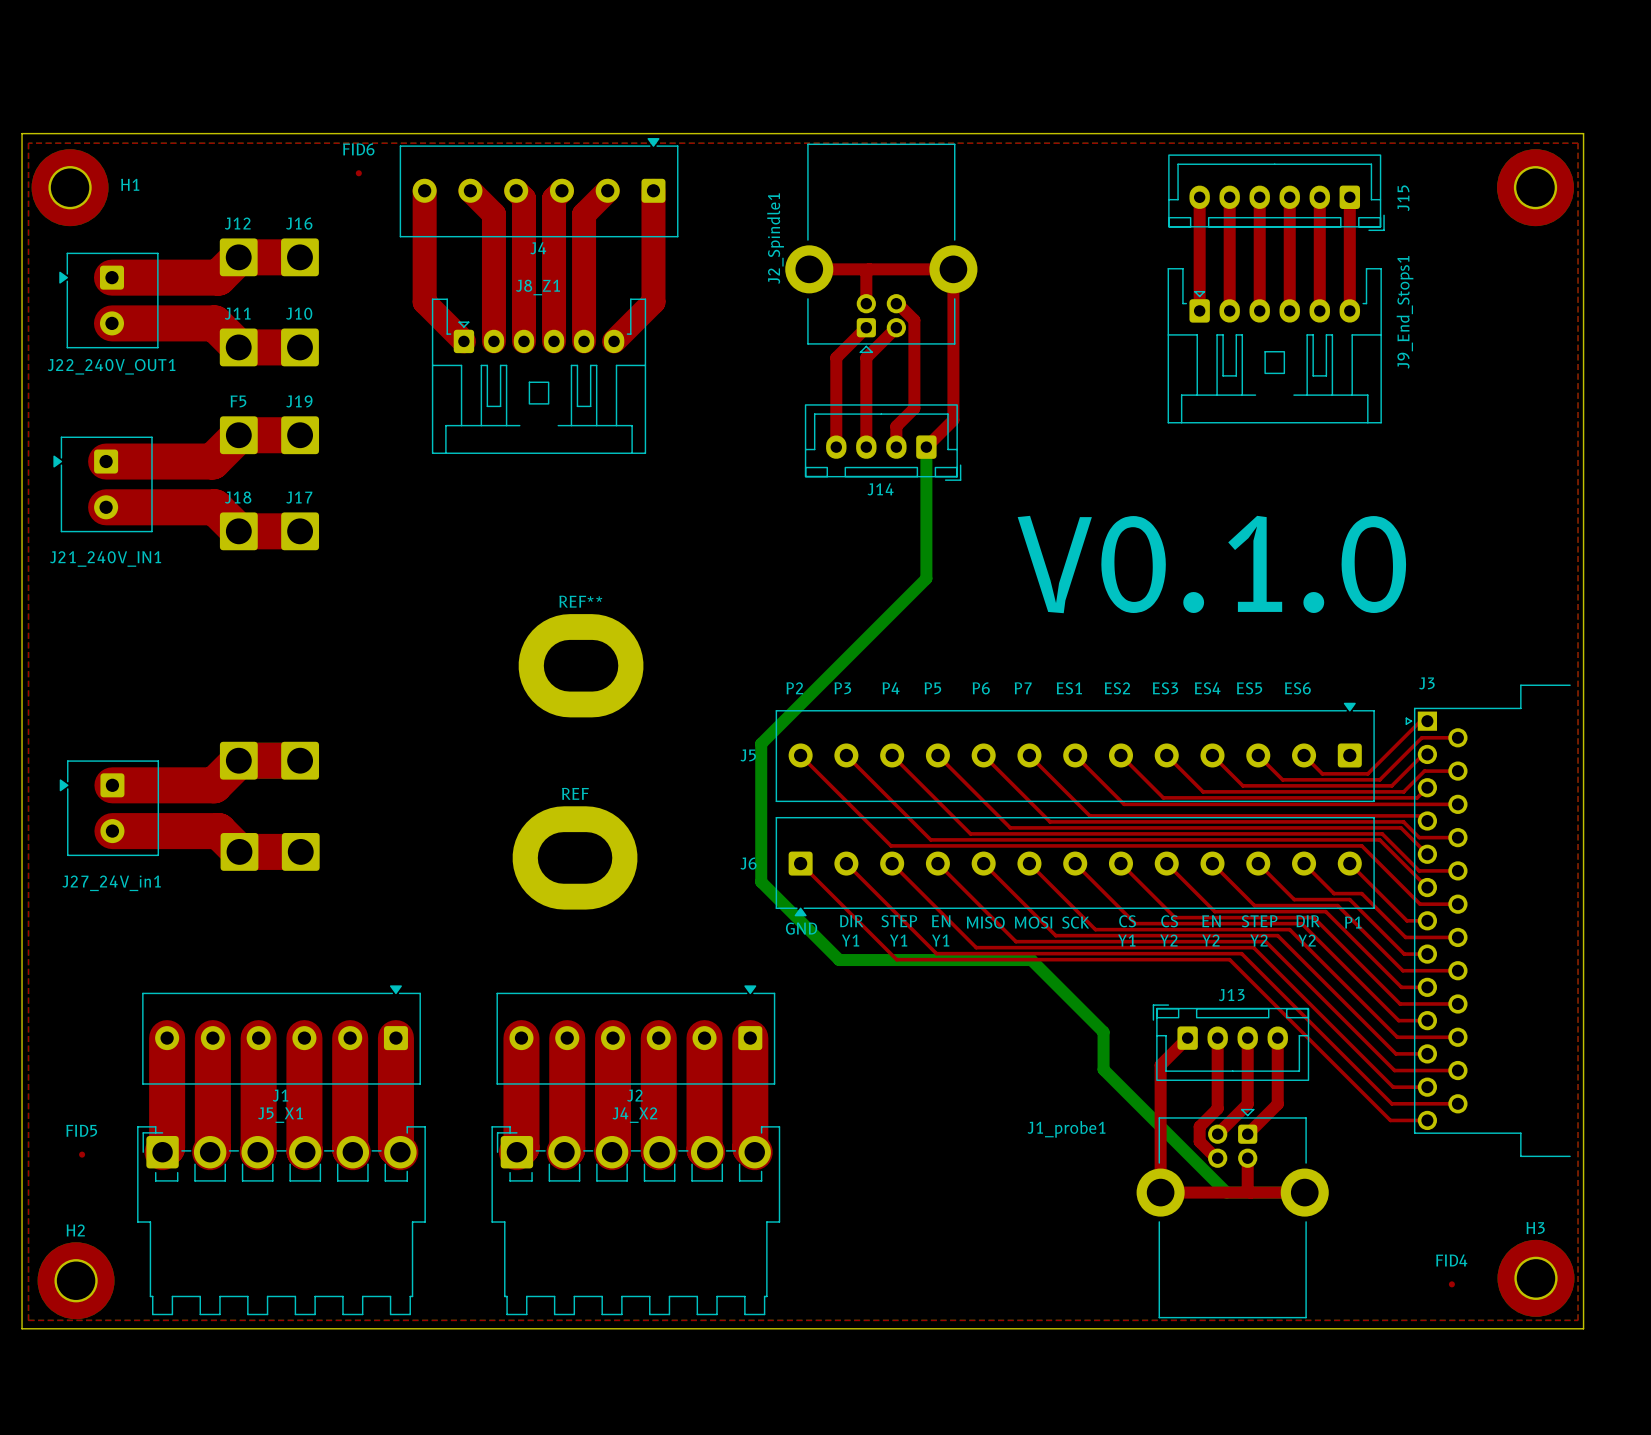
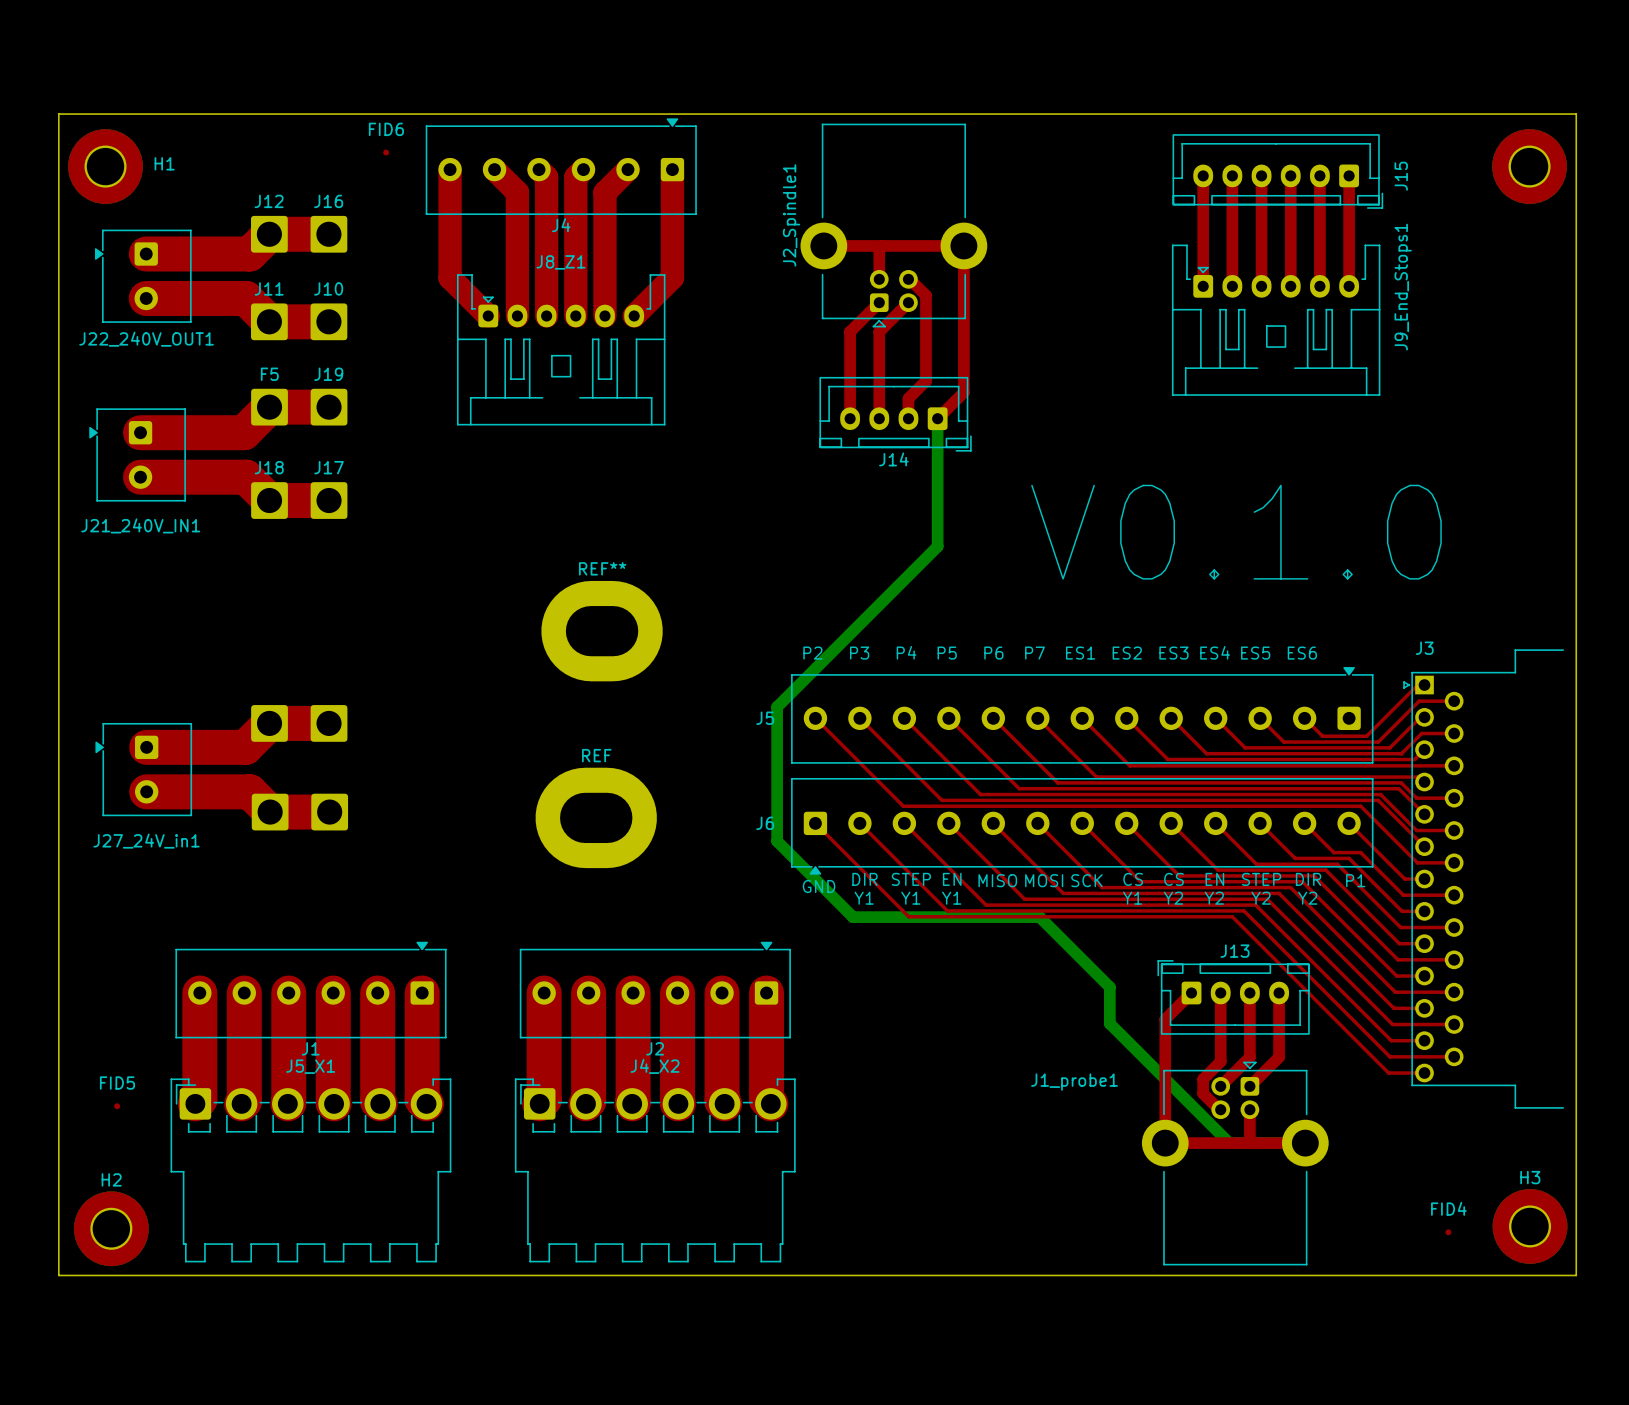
top zone outline: (28, 143) (28, 1320) (1578, 1320) (1578, 143) (28, 143) -> none

